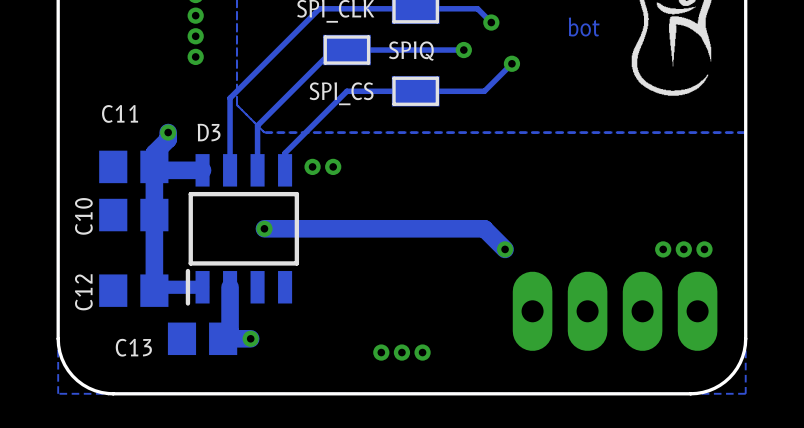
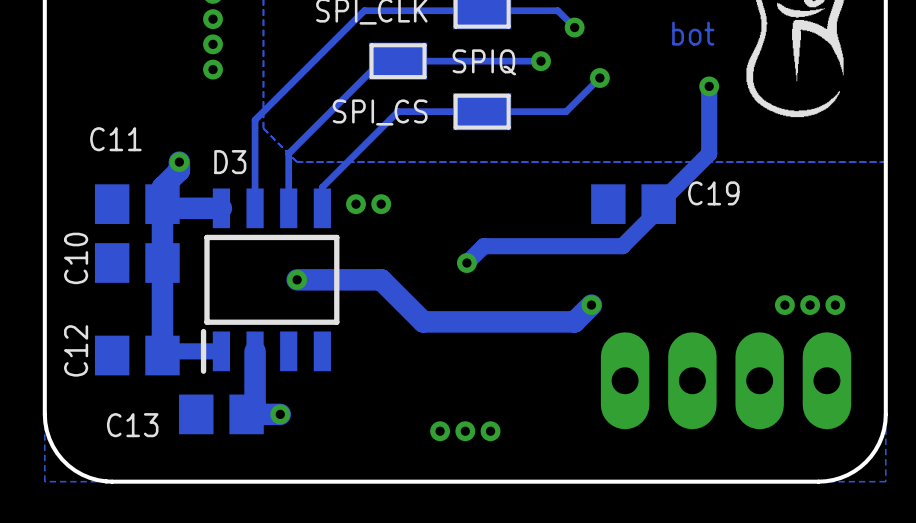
track: none -> (709, 86) (709, 153) (658, 204) (658, 210) (622, 246) (483, 246) (466, 263)
via: none -> (709, 86)
C19: none -> (633, 204)
via: none -> (466, 263)
track: (333, 228) (484, 228) (505, 249) -> (381, 279) (423, 321) (574, 321) (591, 305)

